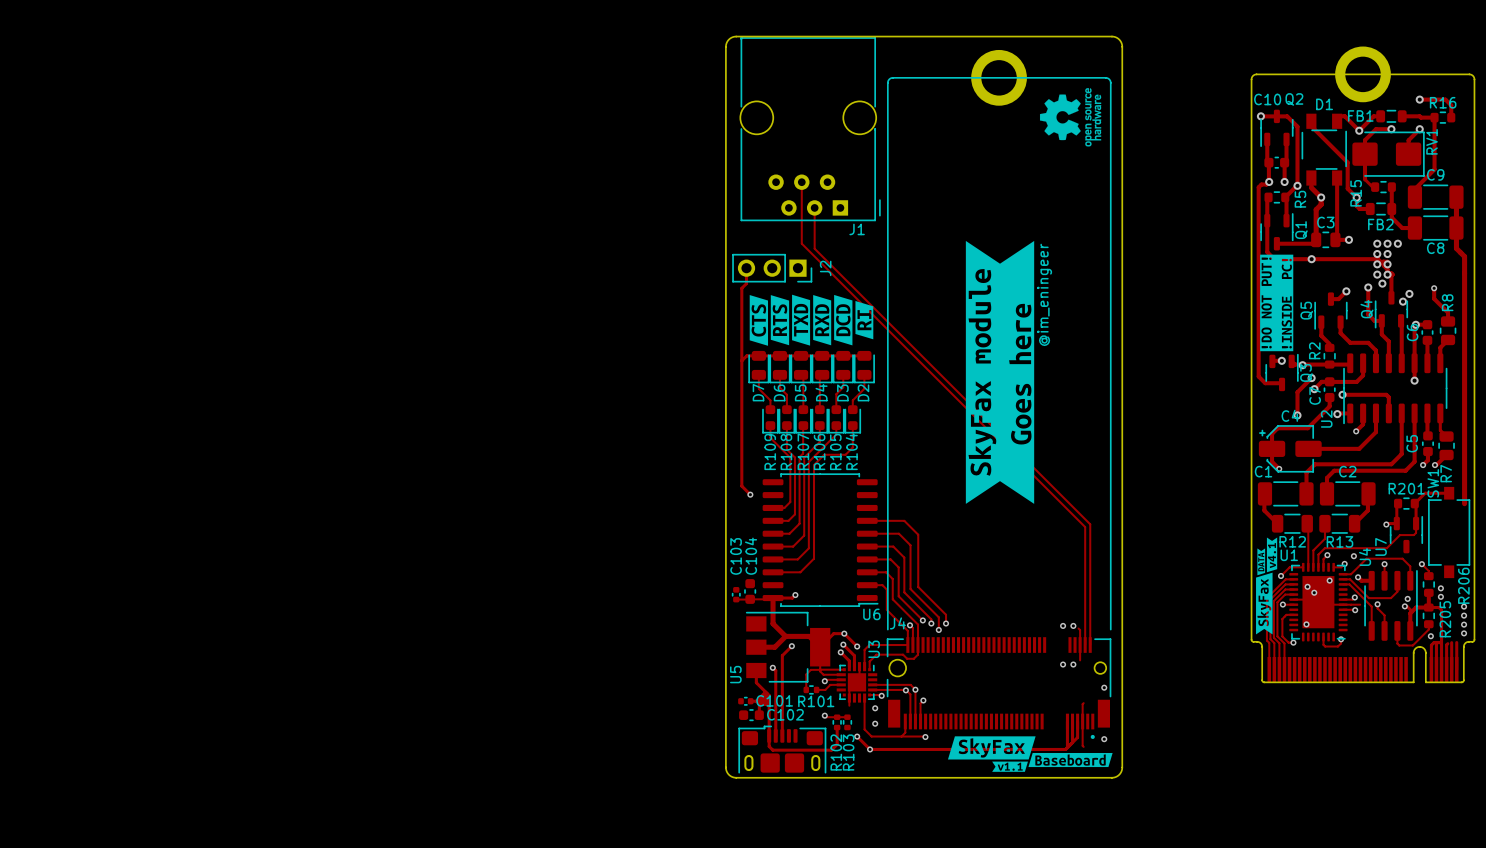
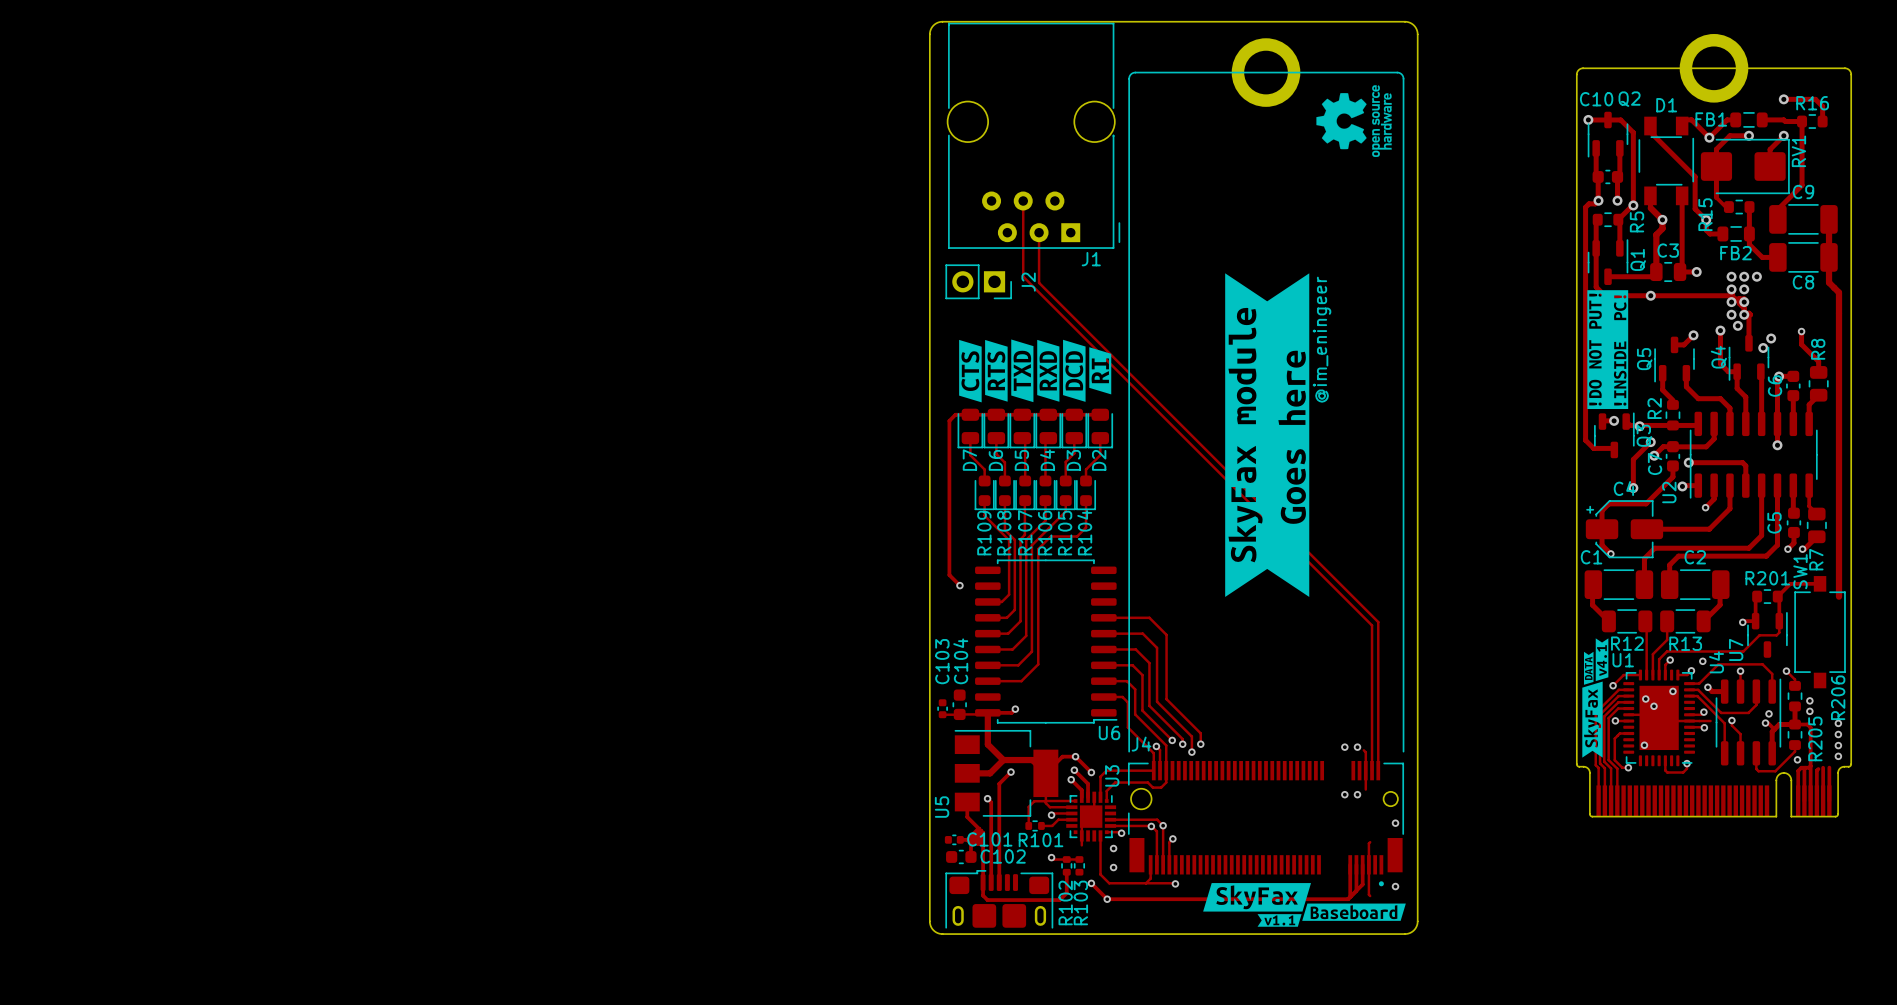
J2 footprint: [732, 254, 813, 283] -> [945, 264, 1012, 300]
track: (746, 268) (746, 283) (741, 288) (741, 360) -> none

